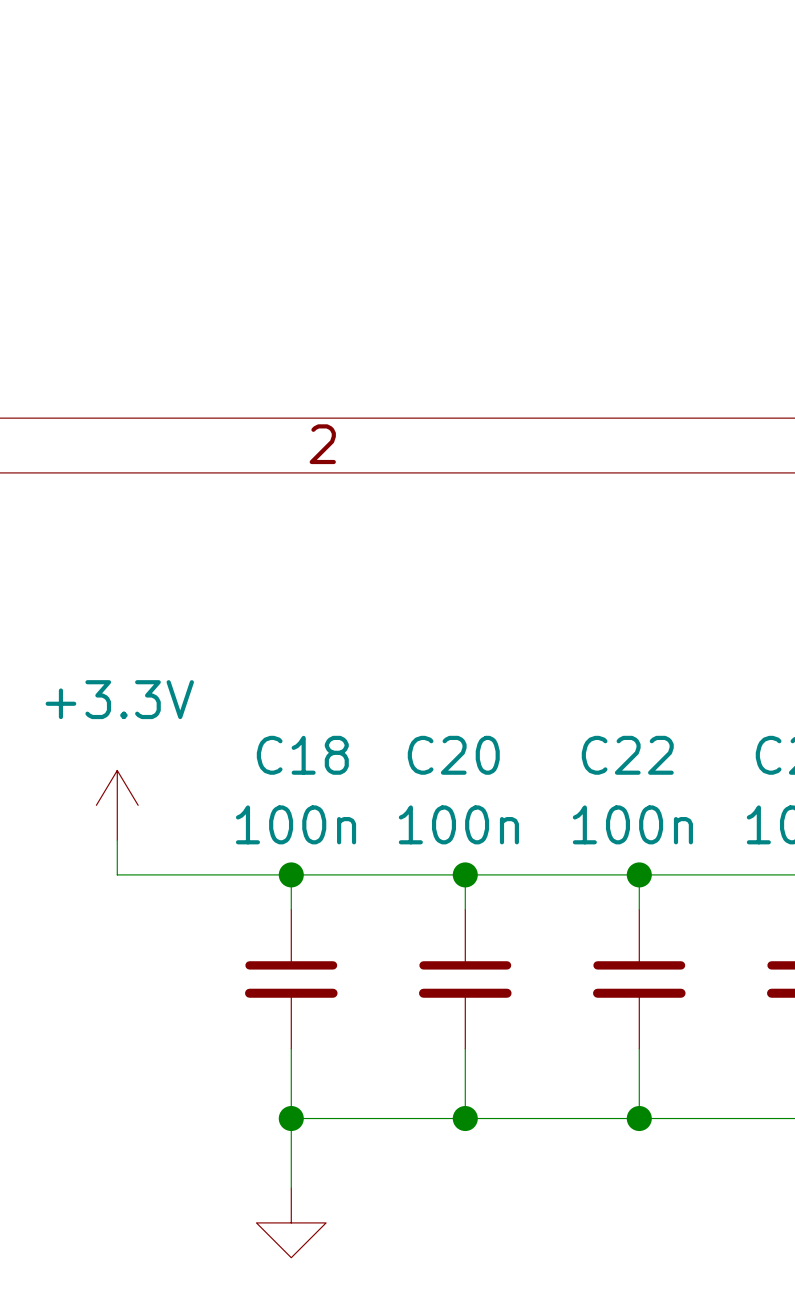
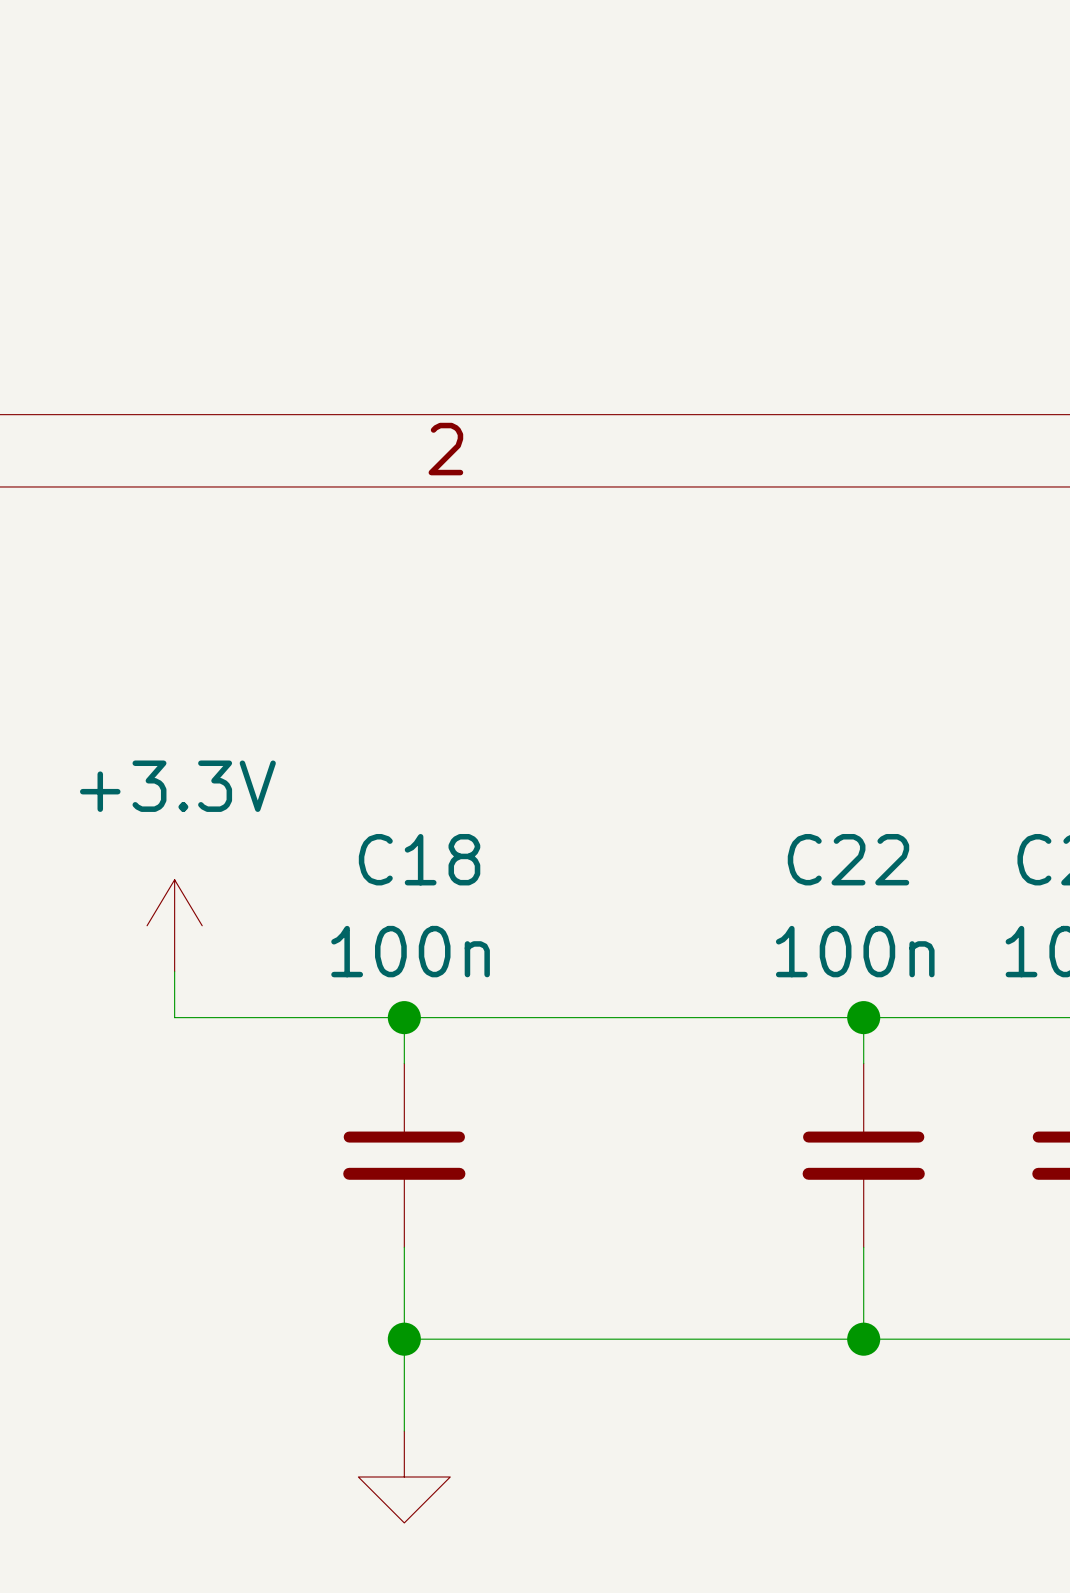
wire: (465, 874) (465, 909) -> none
junction: (465, 874) -> none
C20: 100n (465, 979) -> none
wire: (465, 1048) (465, 1118) -> none
junction: (465, 1118) -> none

